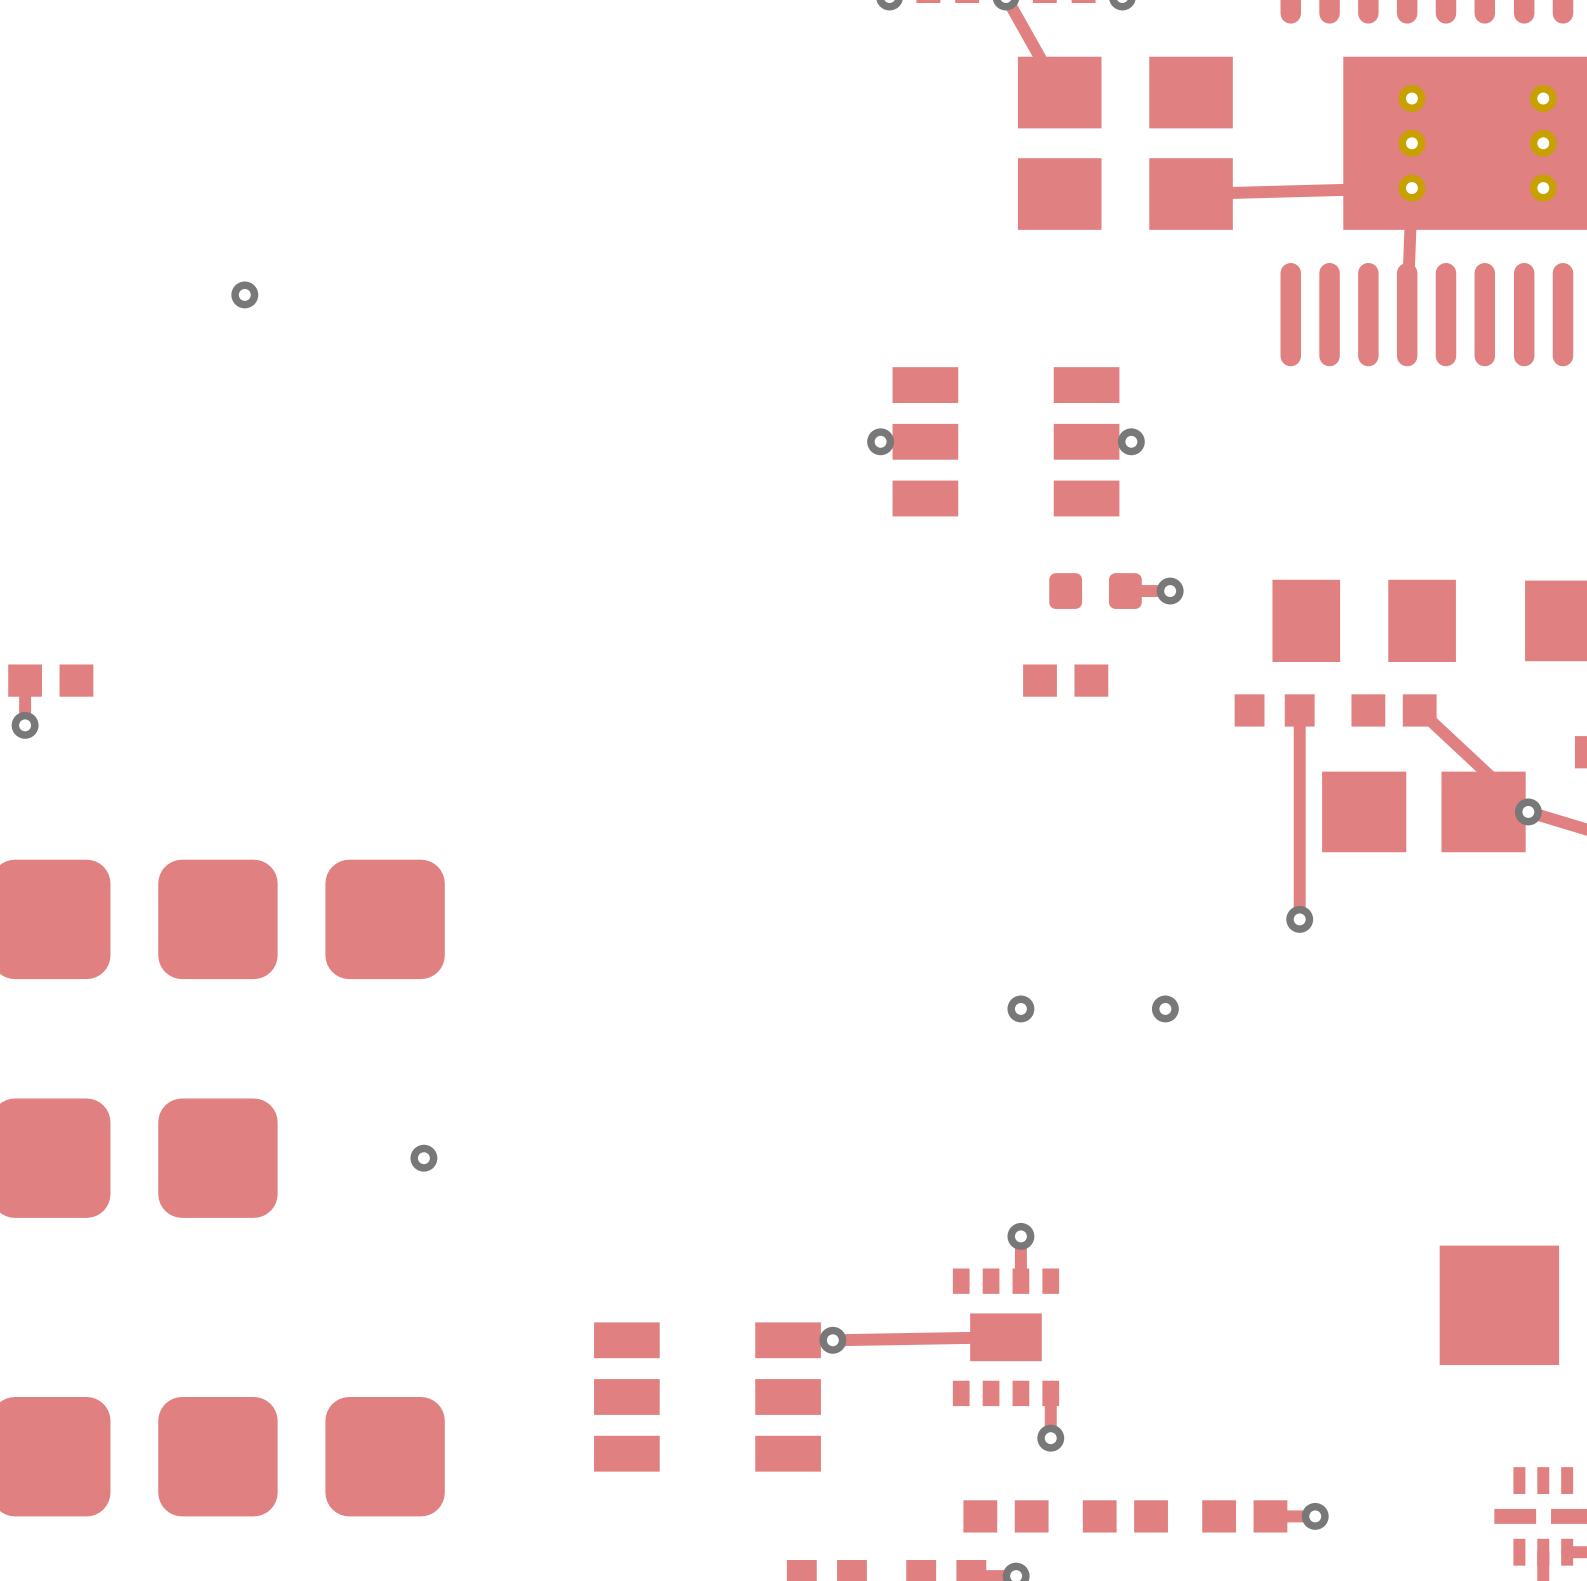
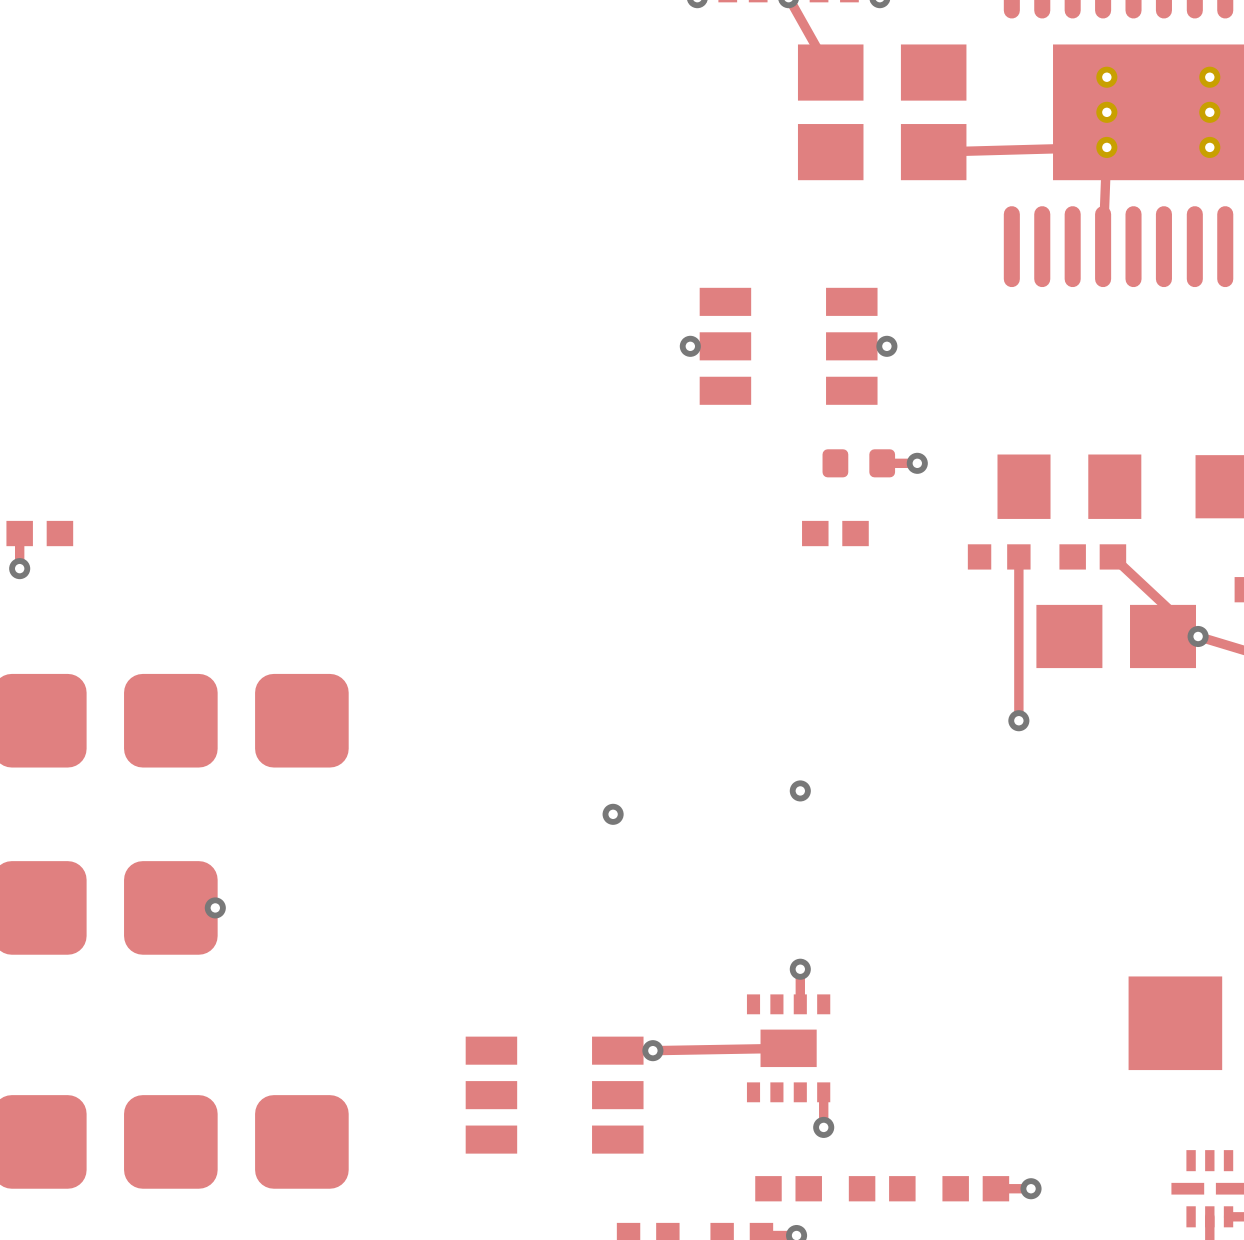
via: (244, 294) -> none
via: (1165, 1008) -> none
via: none -> (613, 814)
via position: (423, 1158) -> (215, 907)

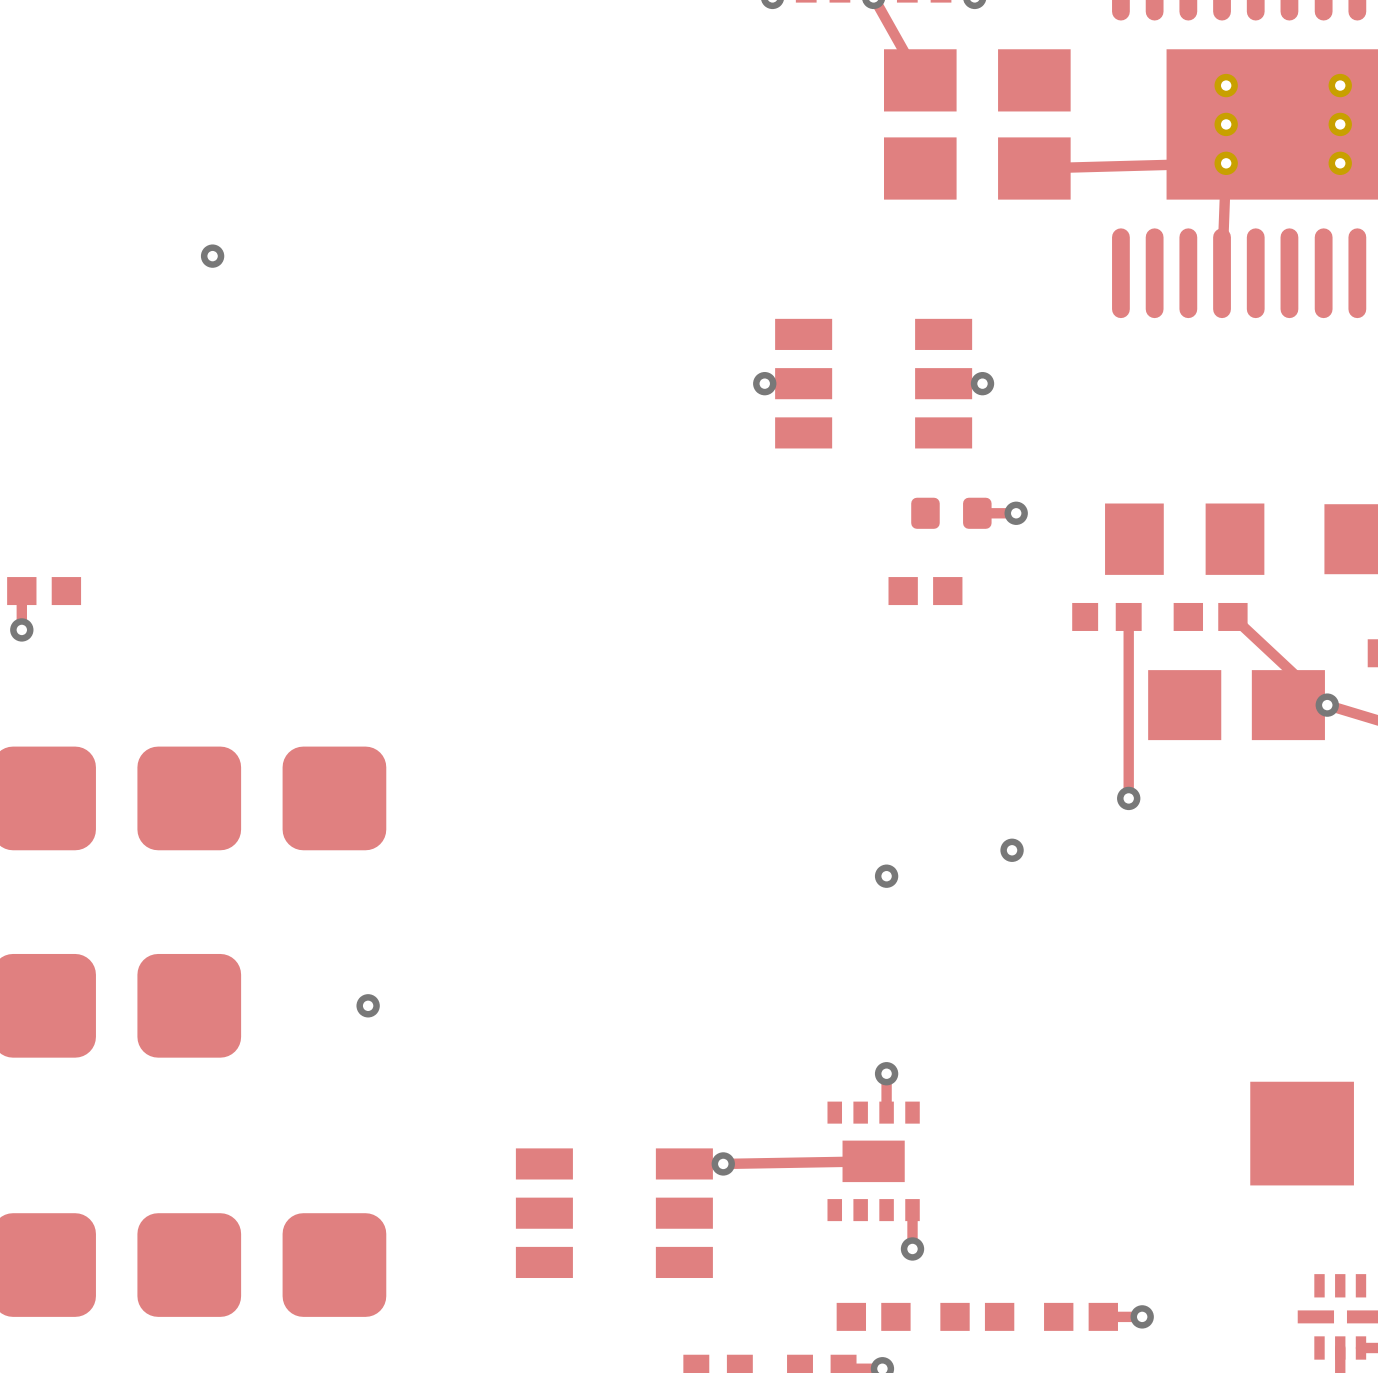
via: none -> (212, 256)
via: none -> (1012, 850)
via: (613, 814) -> none
via position: (215, 907) -> (368, 1005)

